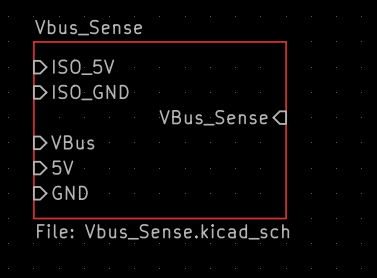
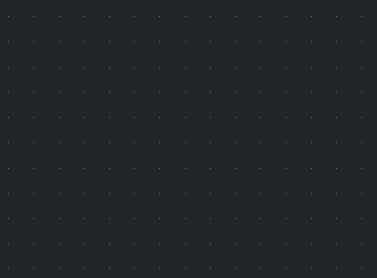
sheet pin: ISO_5V (83, 67) -> none
sheet pin: ISO_GND (90, 92) -> none
sheet pin: VBus_Sense (213, 117) -> none
sheet Vbus_Sense: File: Vbus_Sense.kicad_sch (159, 130) -> none
sheet pin: VBus (72, 142) -> none
sheet pin: 5V (62, 167) -> none
sheet pin: GND (70, 192) -> none

